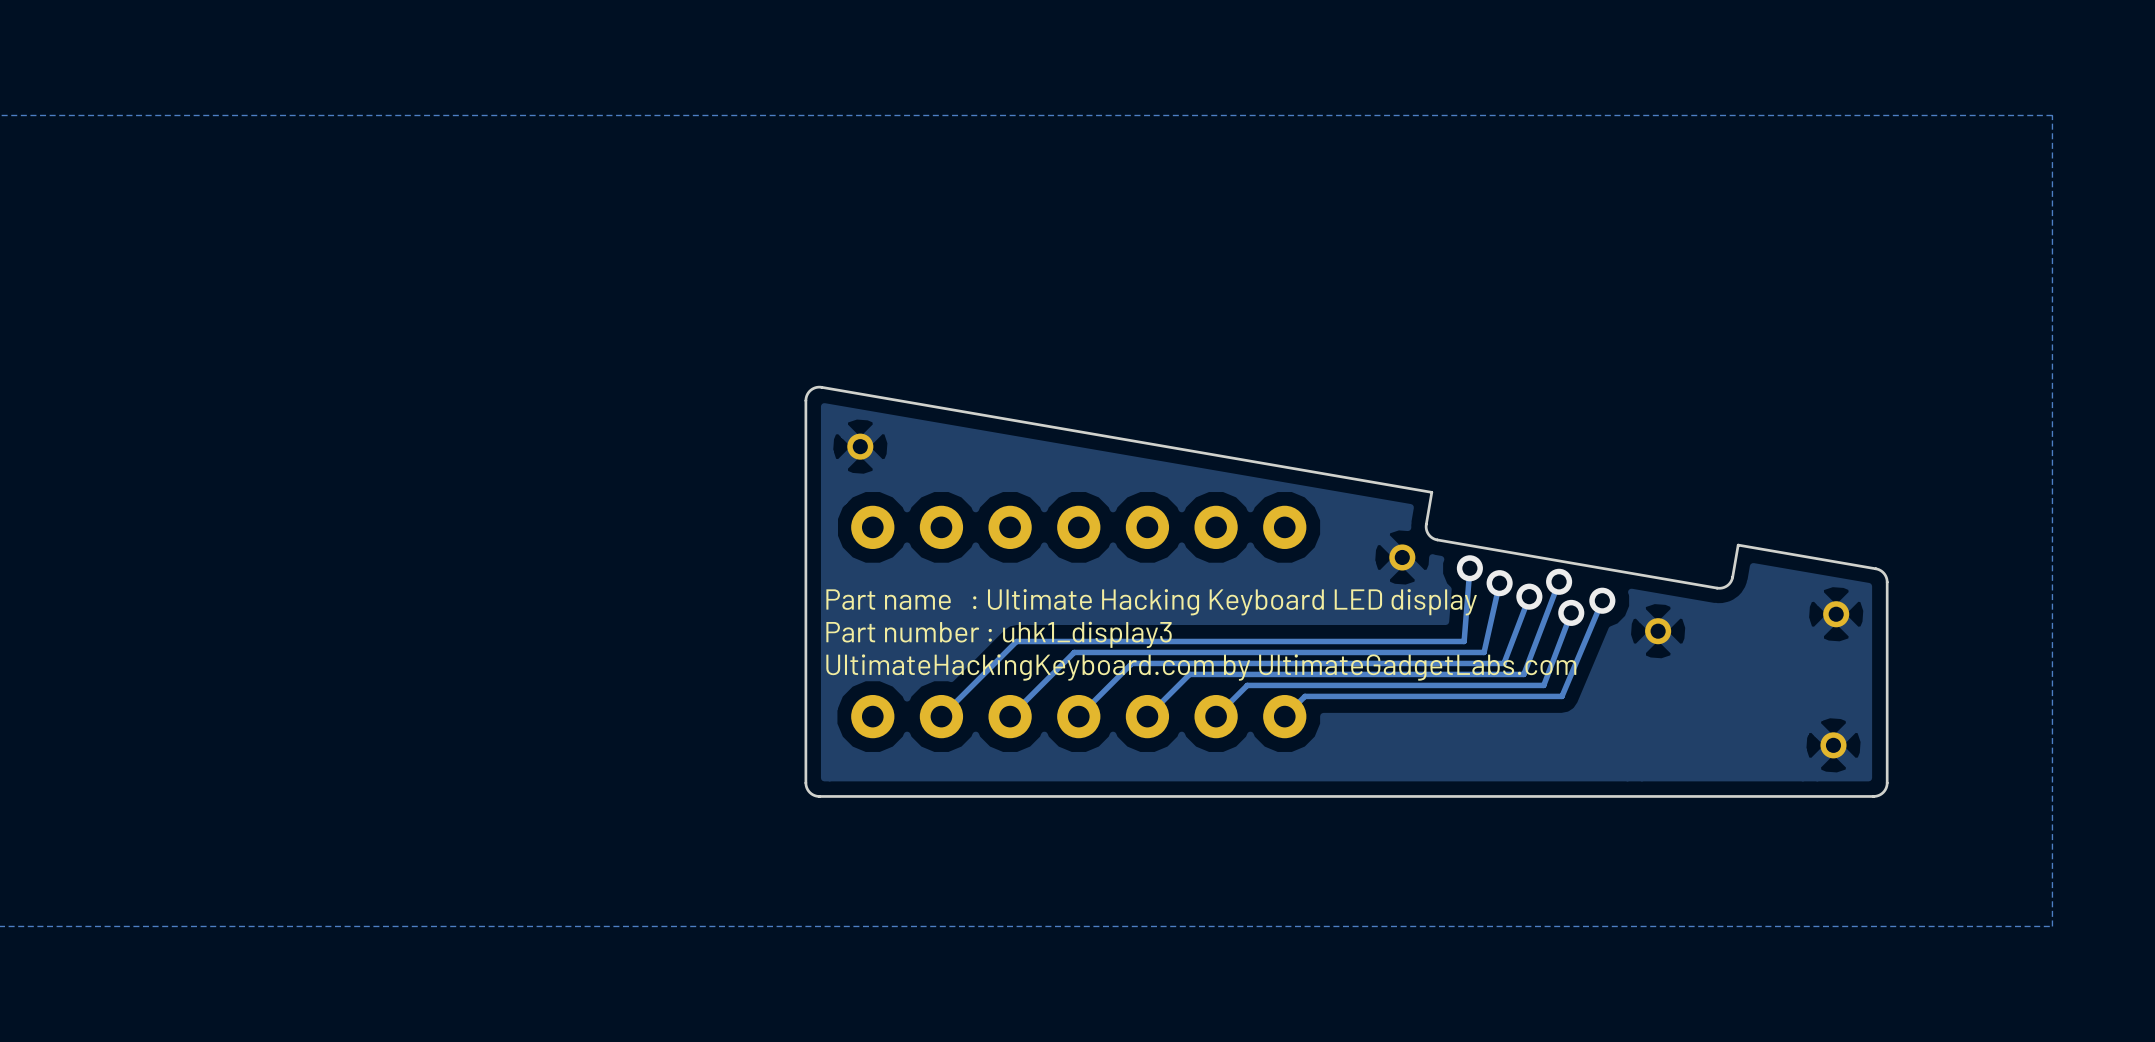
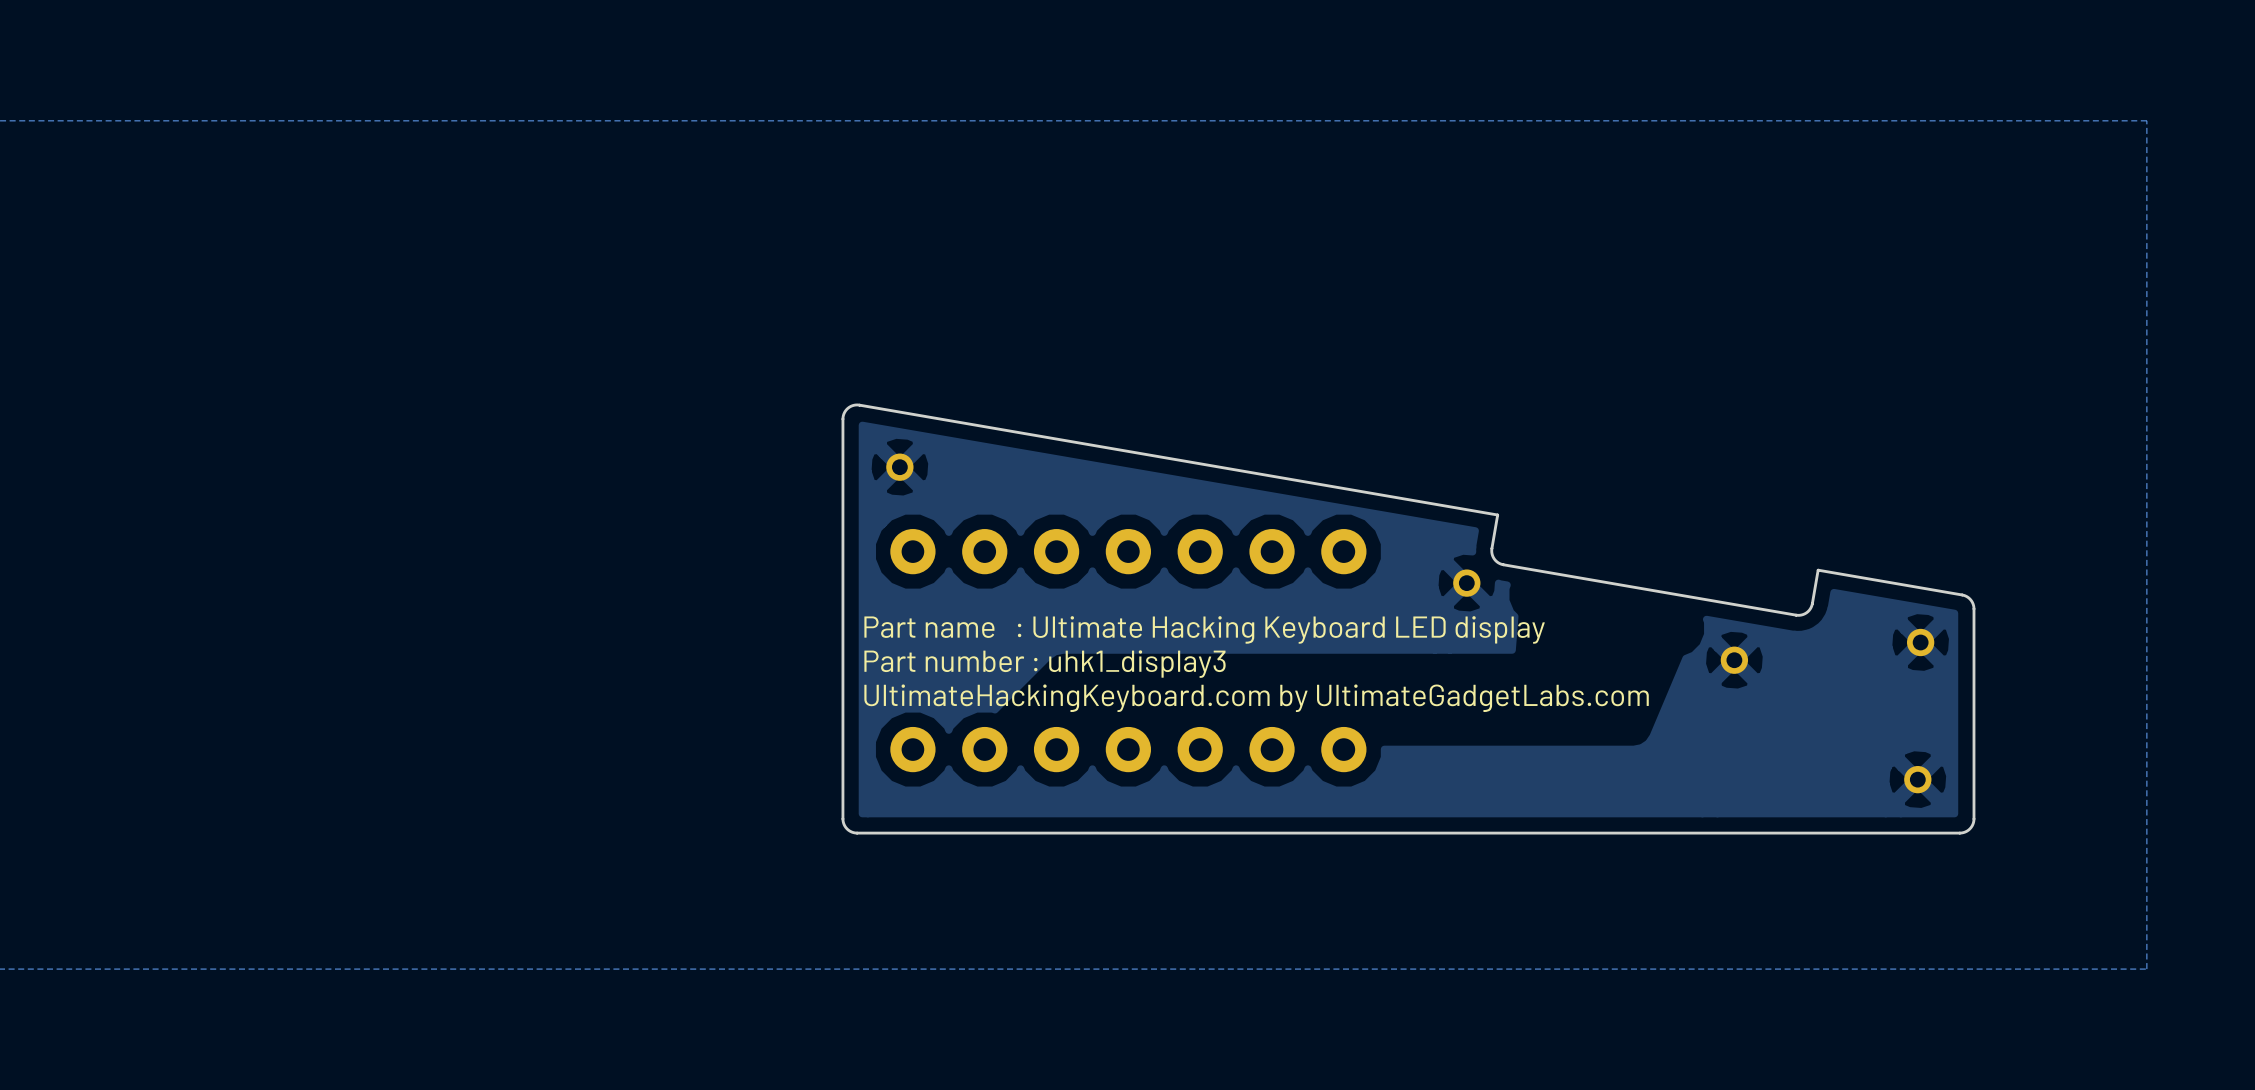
track: (1469, 568) (1464, 641) (1016, 641) (941, 716) -> none
via: (1469, 568) -> none
track: (1559, 581) (1523, 674) (1189, 674) (1147, 716) -> none
via: (1559, 581) -> none
track: (1499, 583) (1484, 652) (1074, 652) (1010, 716) -> none
via: (1499, 583) -> none
track: (1529, 596) (1503, 663) (1131, 663) (1078, 716) -> none
via: (1529, 596) -> none
track: (1602, 600) (1561, 696) (1304, 696) (1284, 716) -> none
via: (1602, 600) -> none
track: (1571, 612) (1543, 685) (1247, 685) (1216, 716) -> none
via: (1571, 612) -> none

